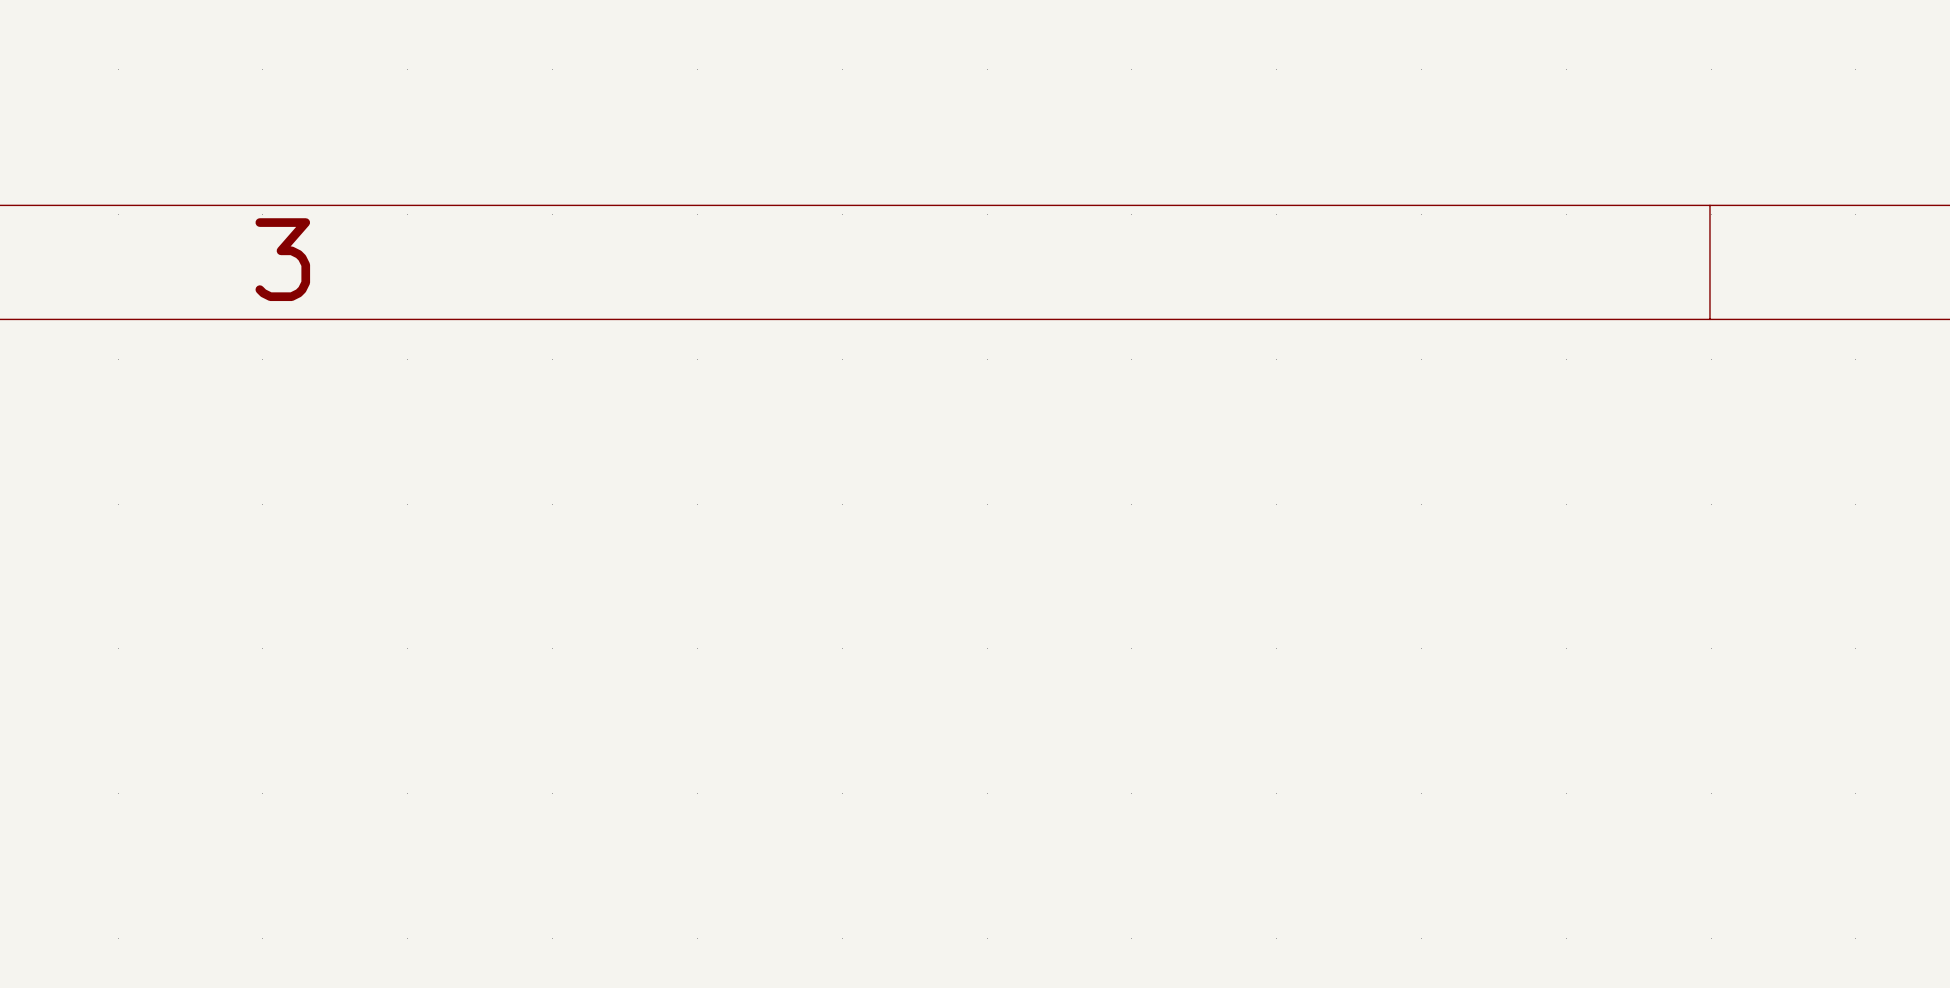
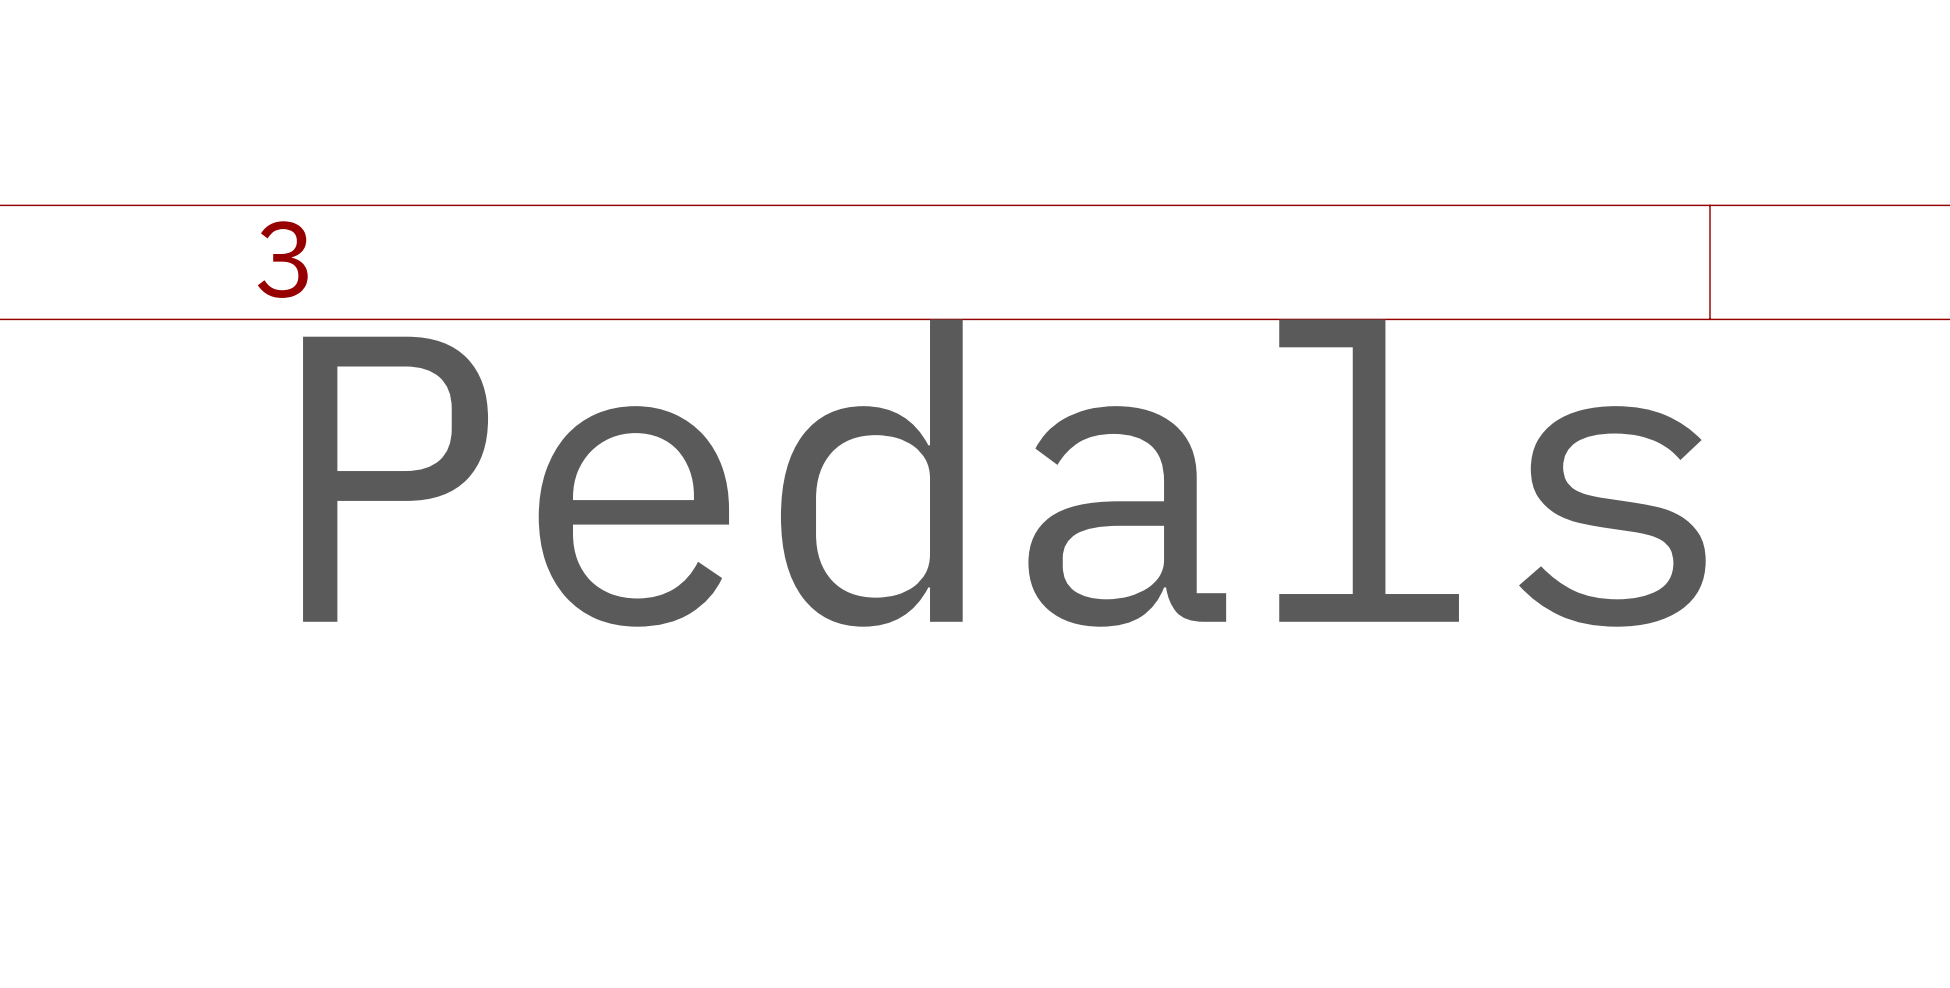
text: none -> Pedals (1004, 473)

